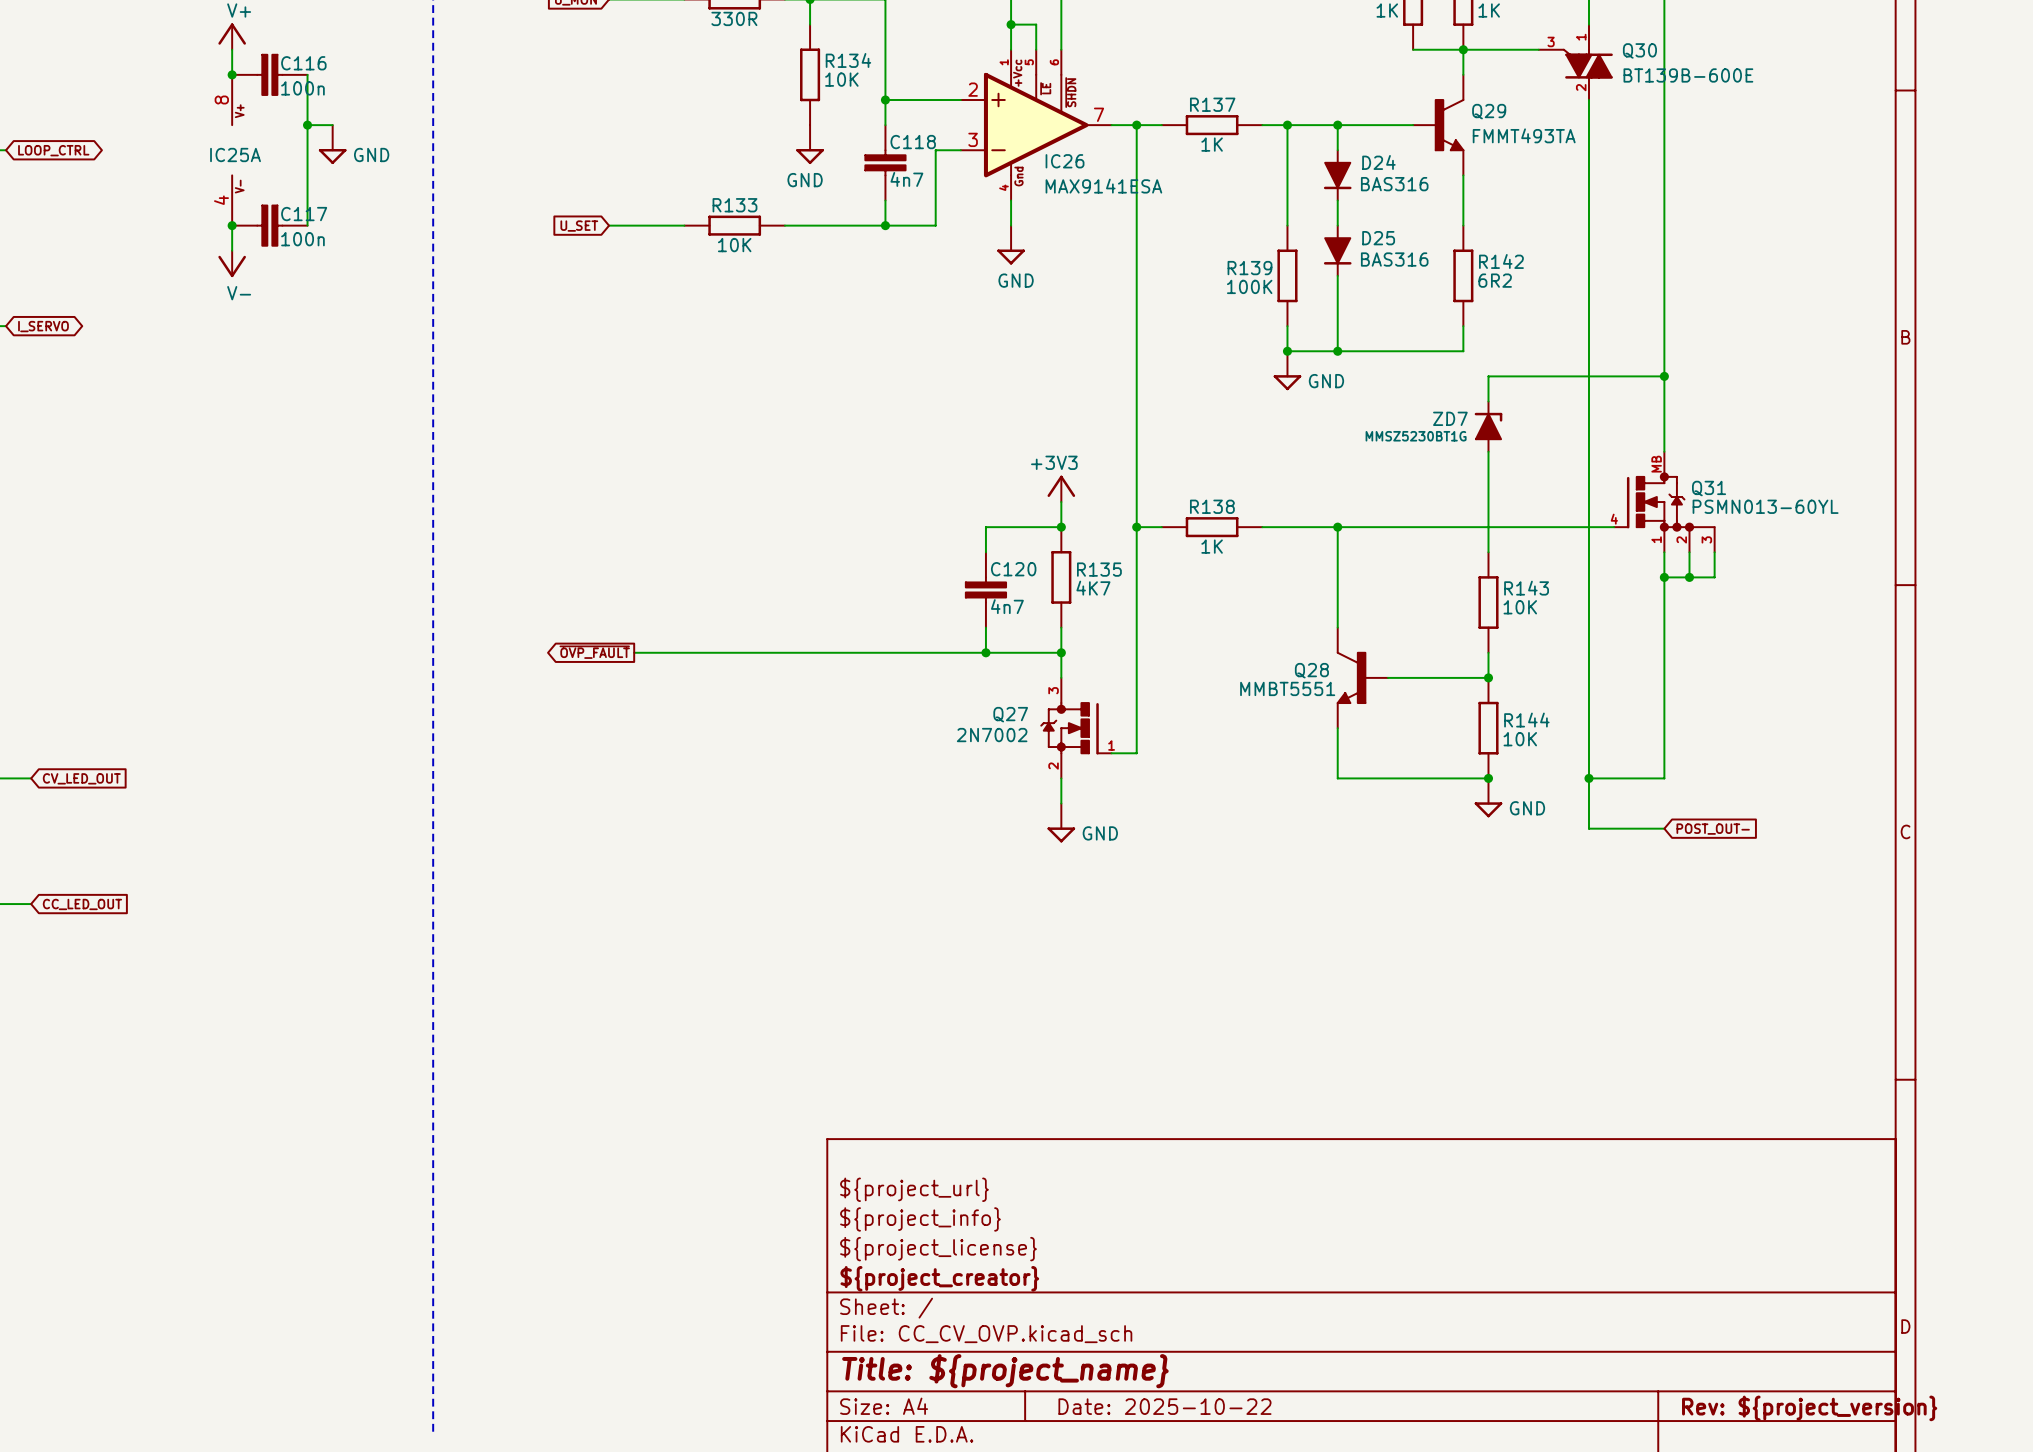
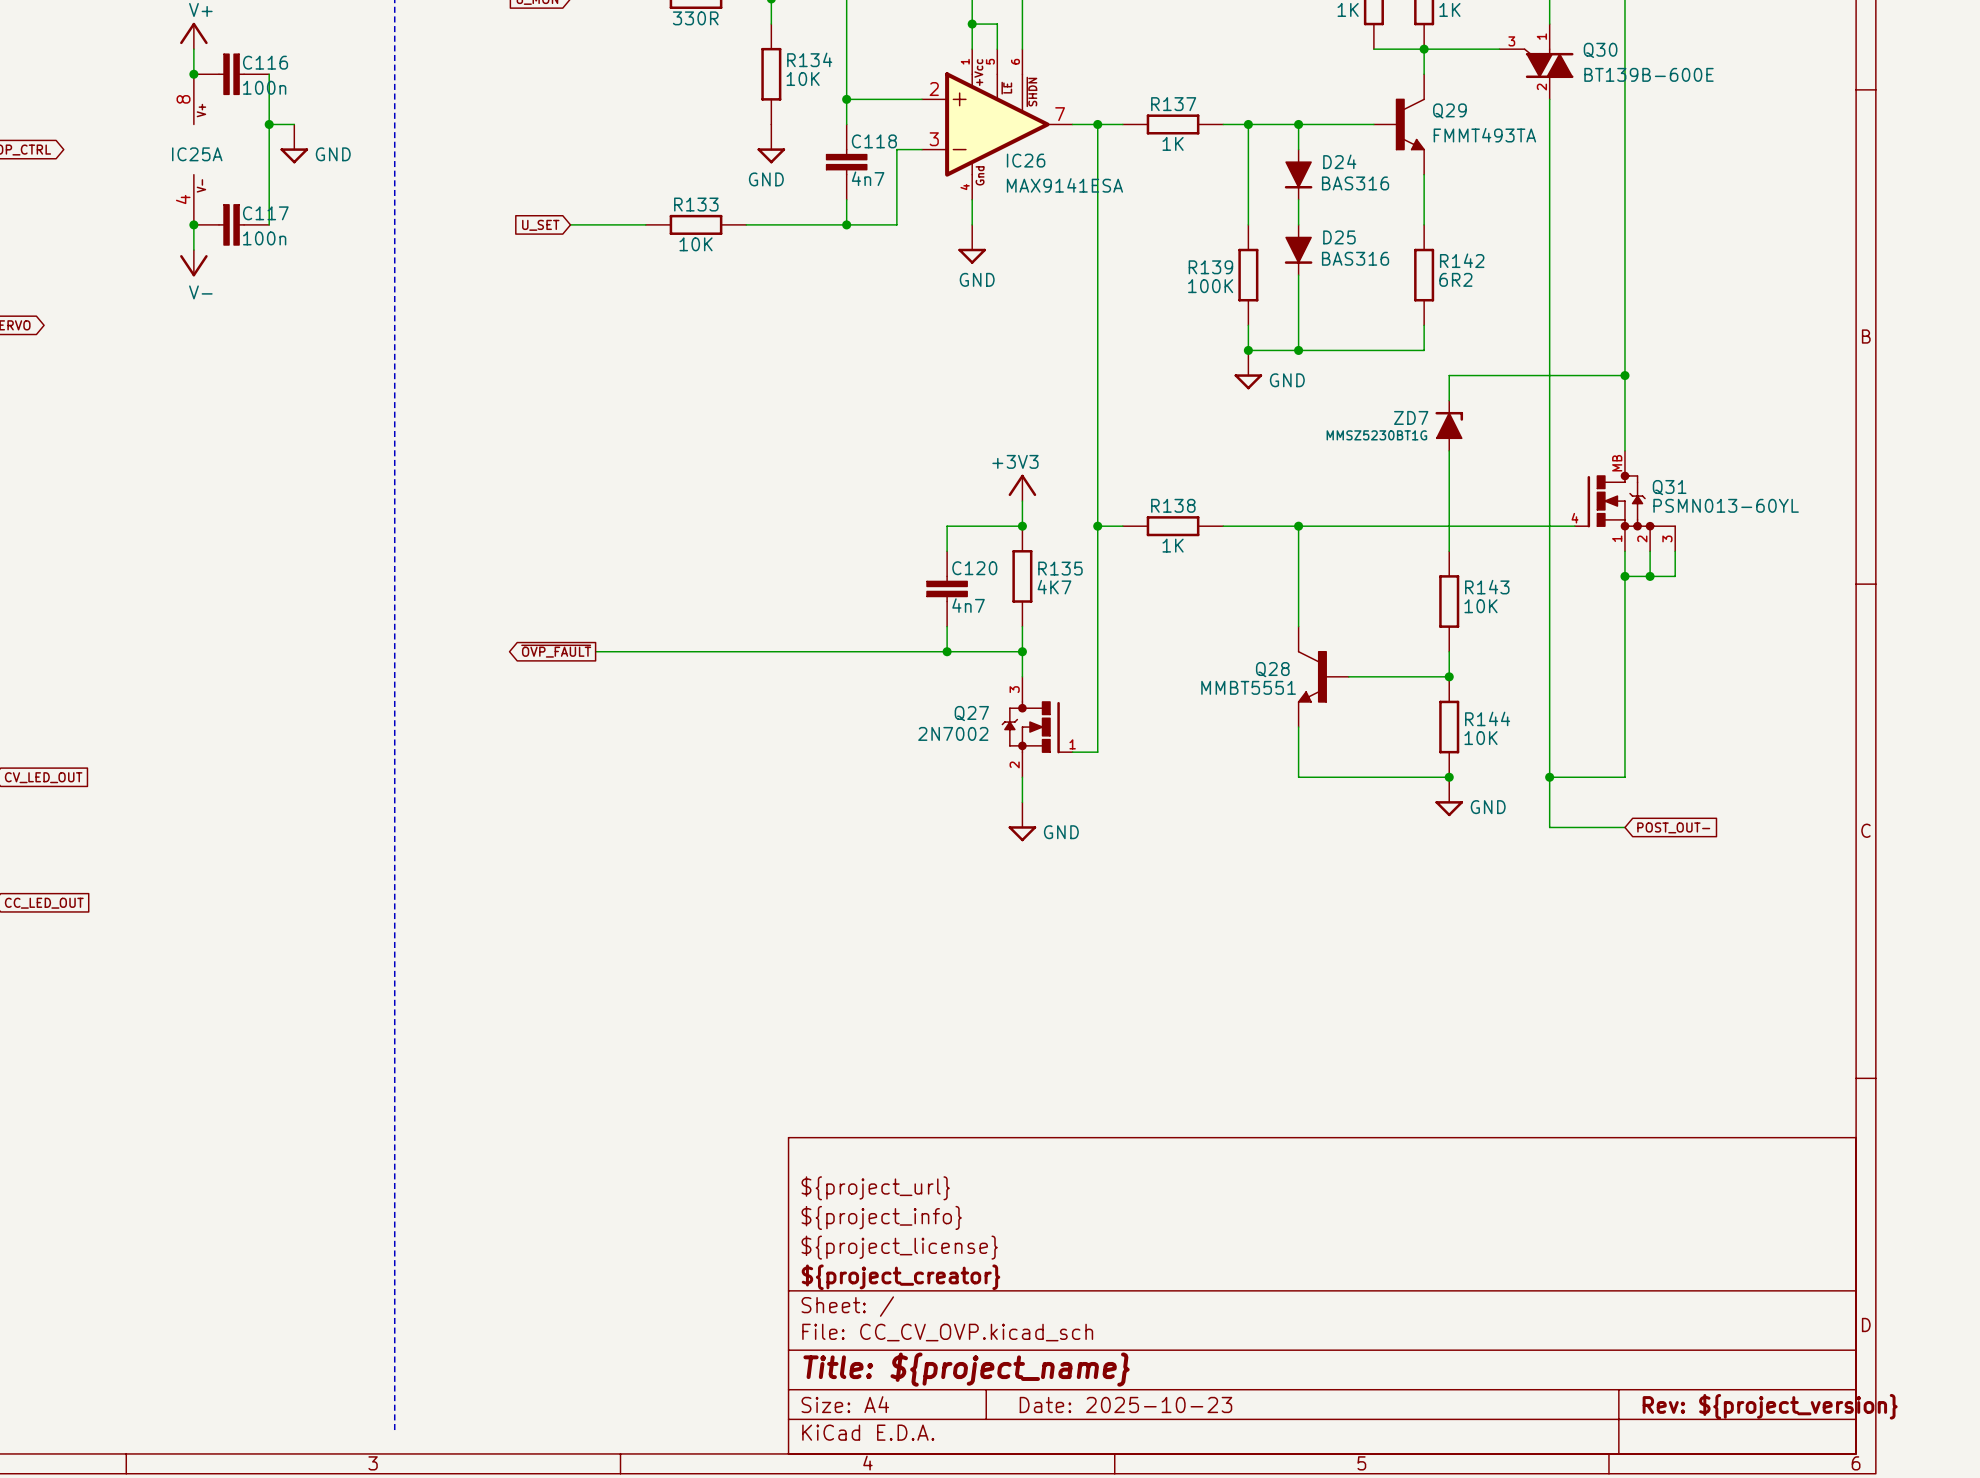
title block: Date: 2025-10-22 (1164, 1406) -> Date: 2025-10-23 (1125, 1404)

